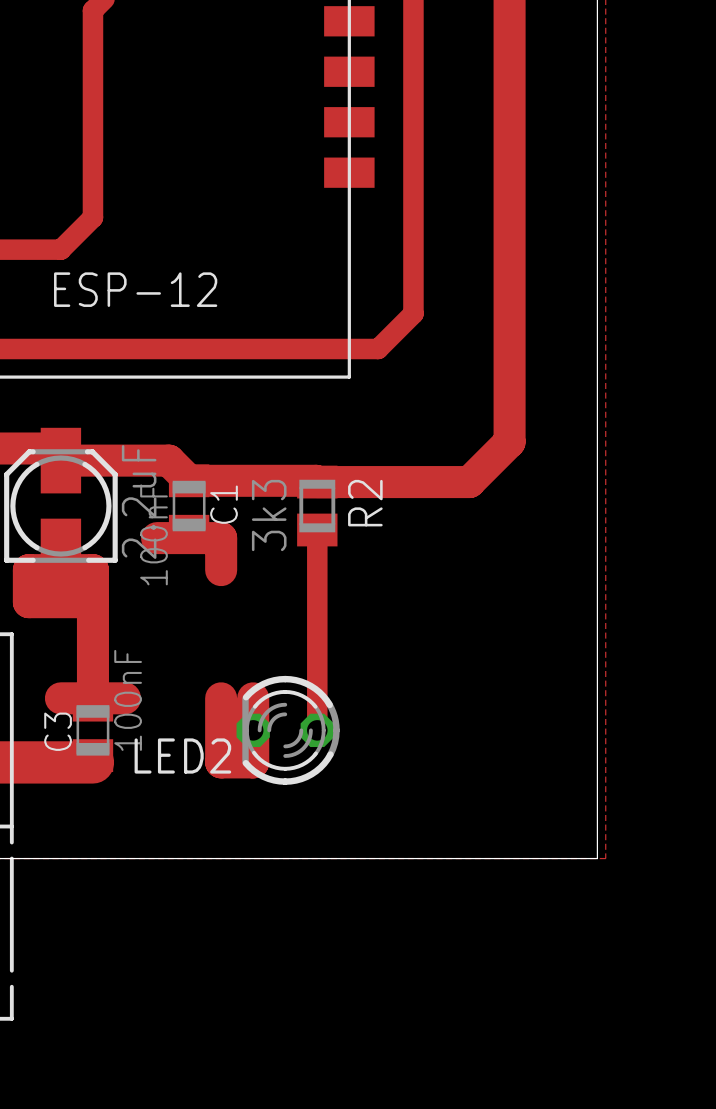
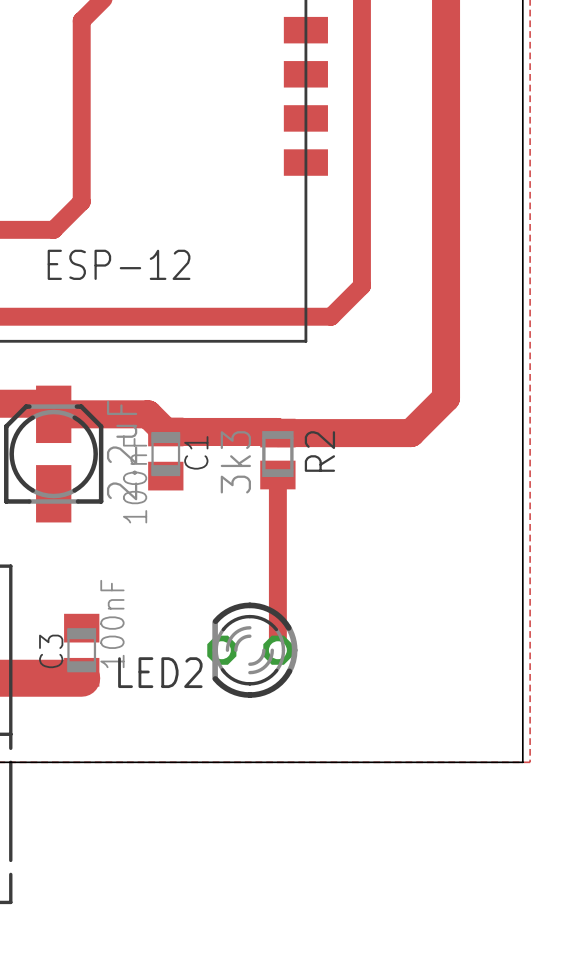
track: (157, 538) (221, 538) (221, 570) -> none
track: (92, 602) (28, 602) (28, 570) (92, 570) (92, 698) -> none
track: (60, 698) (125, 698) -> none
track: (221, 698) (221, 762) (253, 762) (253, 698) -> none

